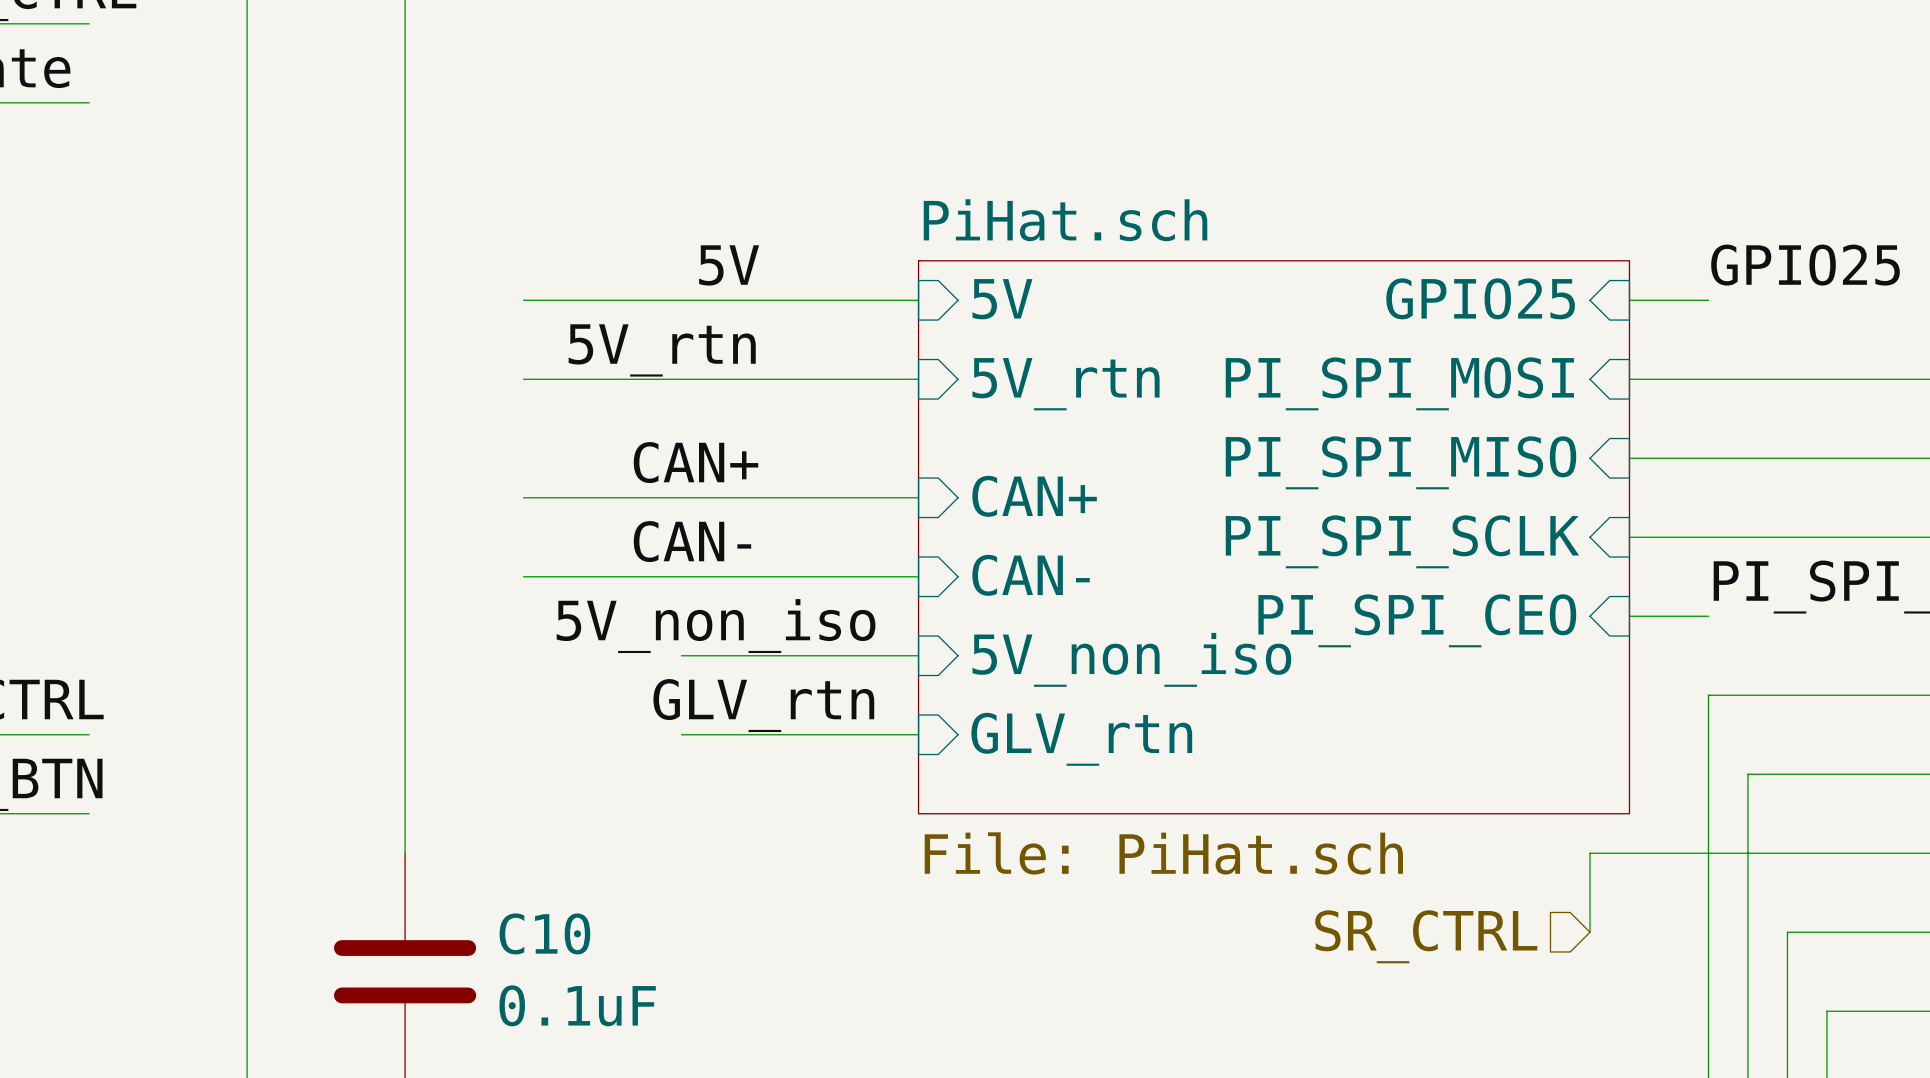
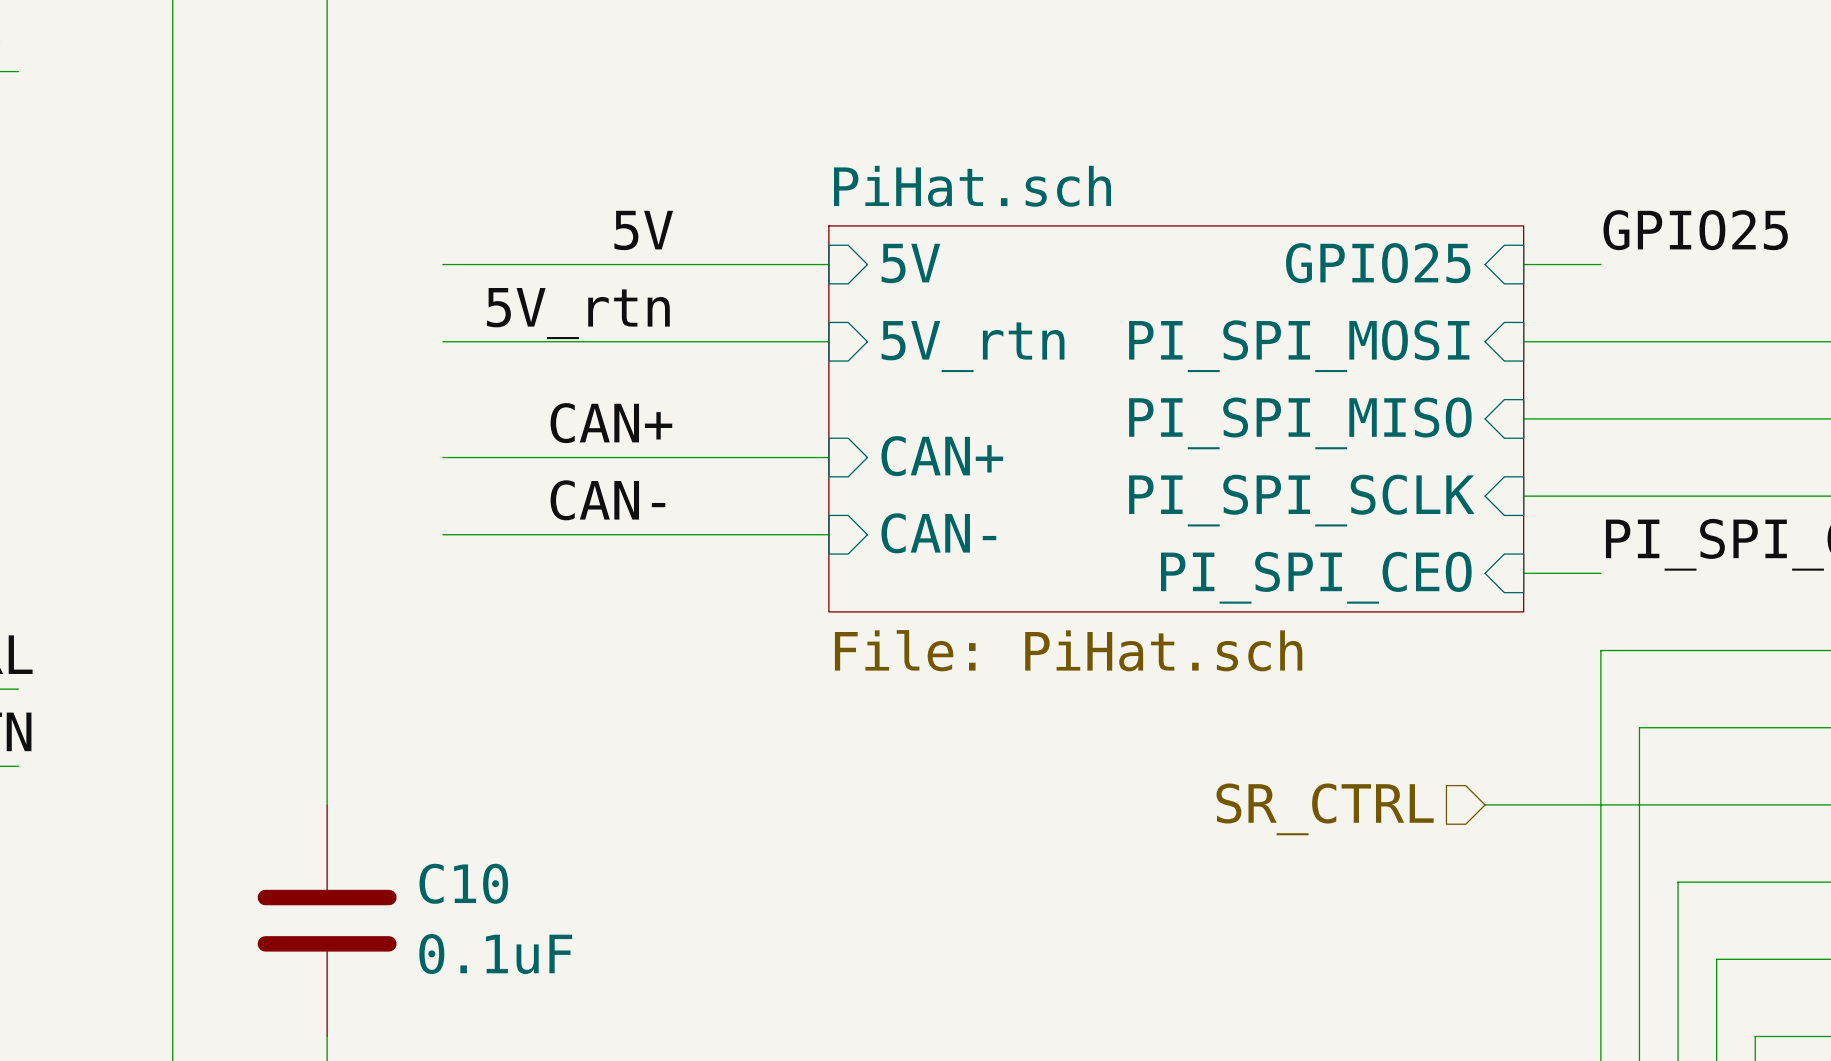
sheet PiHat.sch: none -> File: PiHat.sch (1176, 418)
sheet PiHat.sch: File: PiHat.sch (1274, 537) -> none
label: 5V_non_iso (716, 626) -> none
wire: (681, 655) (918, 655) -> none
sheet pin: 5V_non_iso (1131, 659) -> none
label: GLV_rtn (763, 705) -> none
wire: (681, 734) (918, 734) -> none
sheet pin: GLV_rtn (1081, 739) -> none
wire: (1589, 853) (1589, 932) -> none
hierarchical label position: SR_CTRL (1426, 936) -> SR_CTRL (1325, 809)

